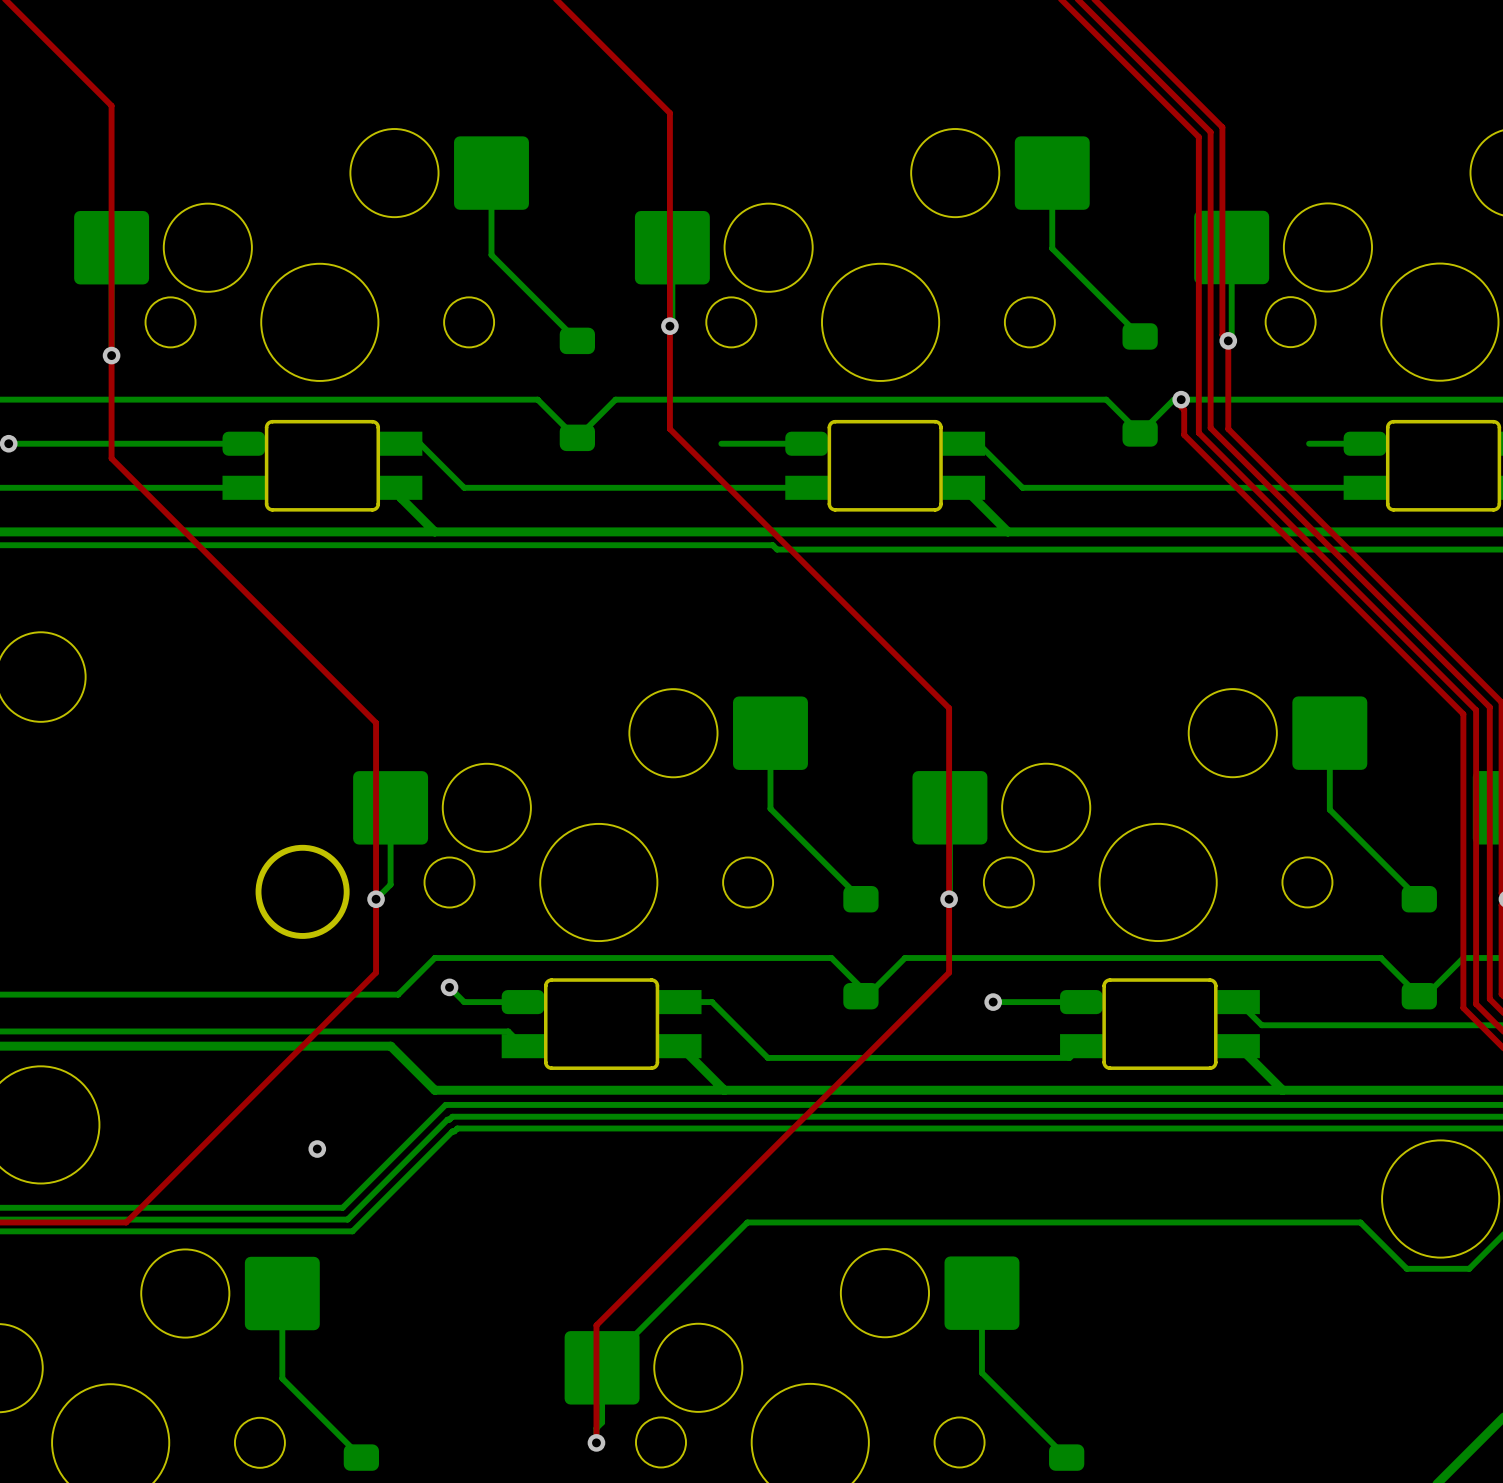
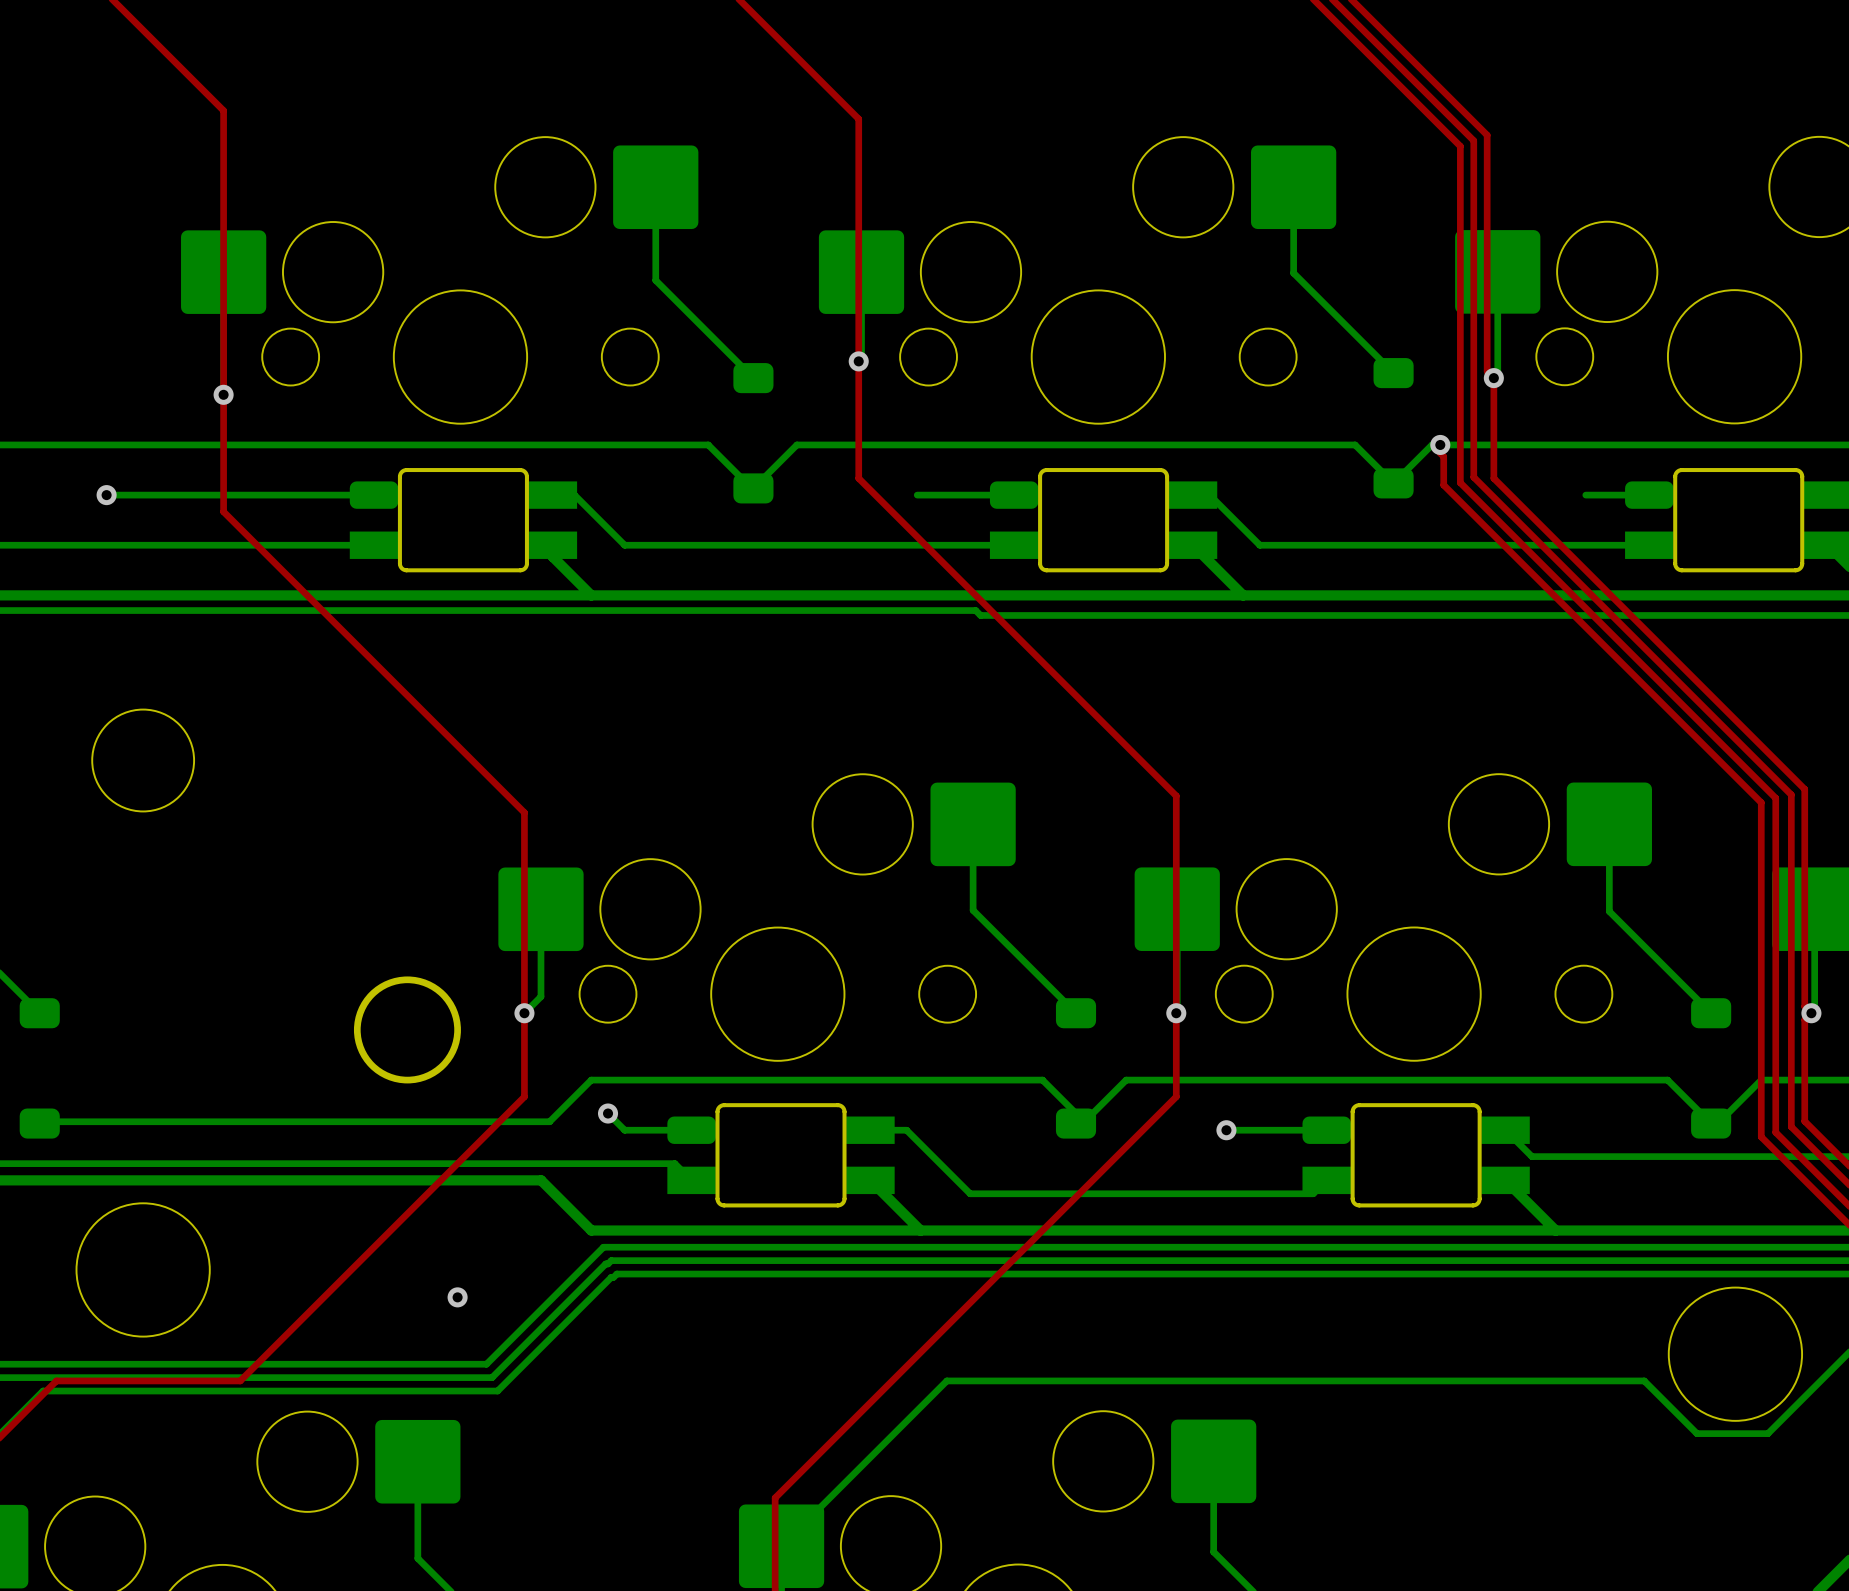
round board edge position: (302, 891) -> (407, 1029)

